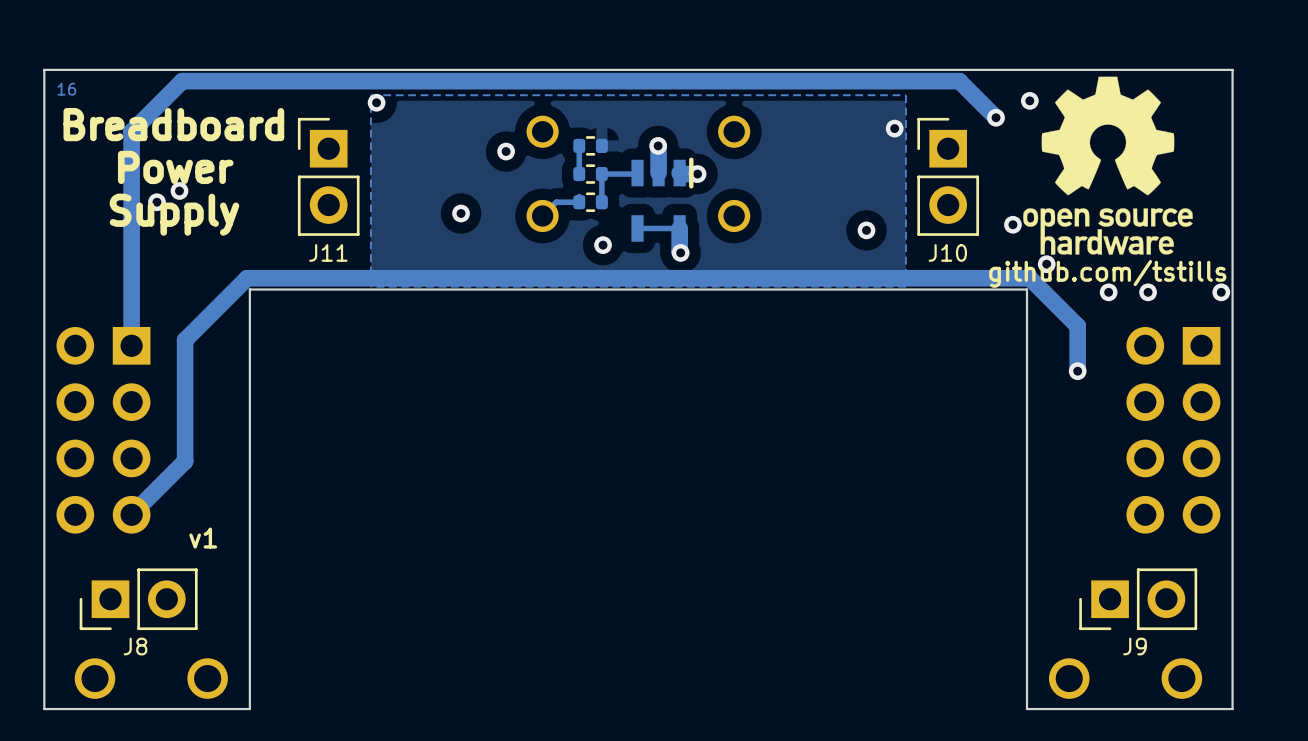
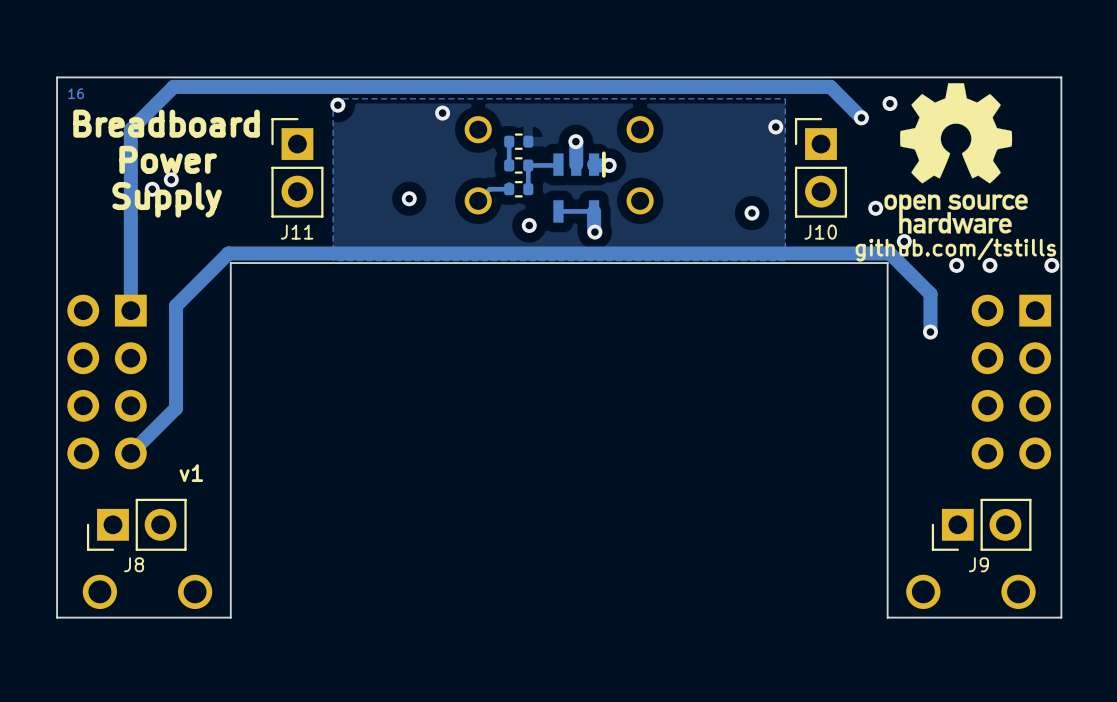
via position: (506, 151) -> (442, 113)

